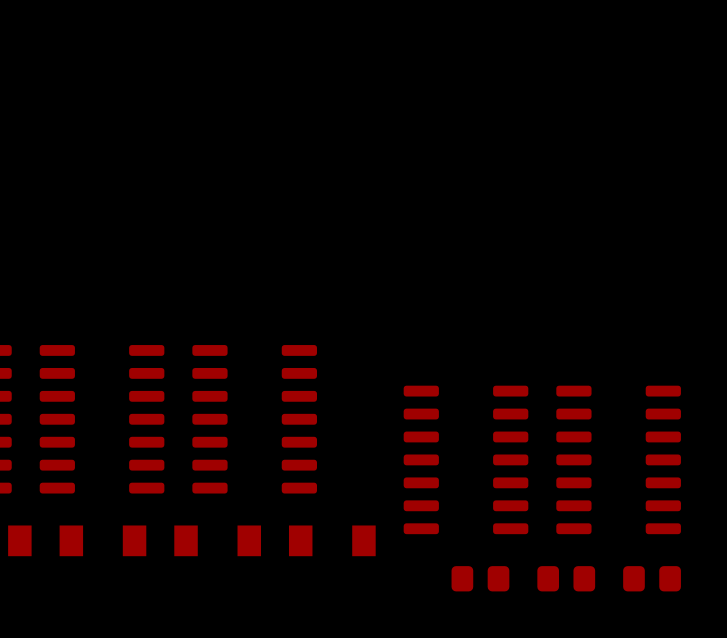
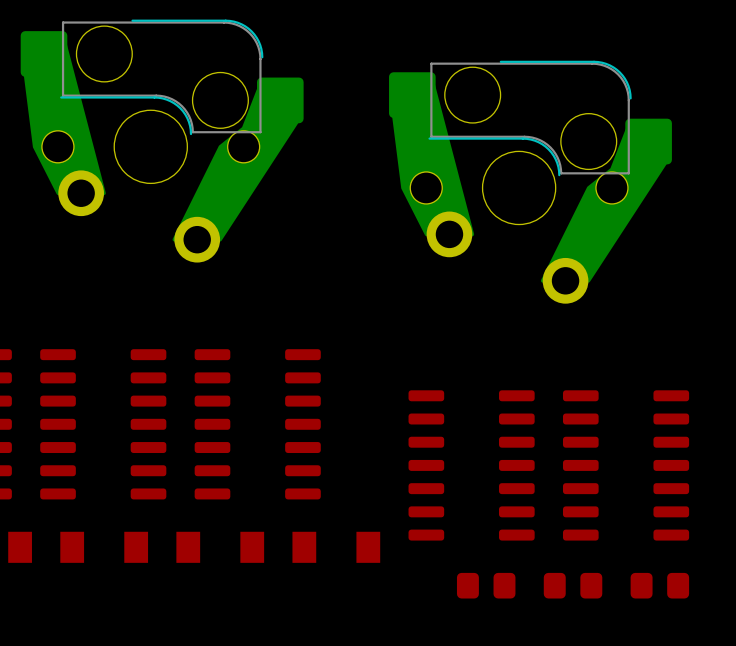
part: none -> (162, 141)
part: none -> (530, 182)

